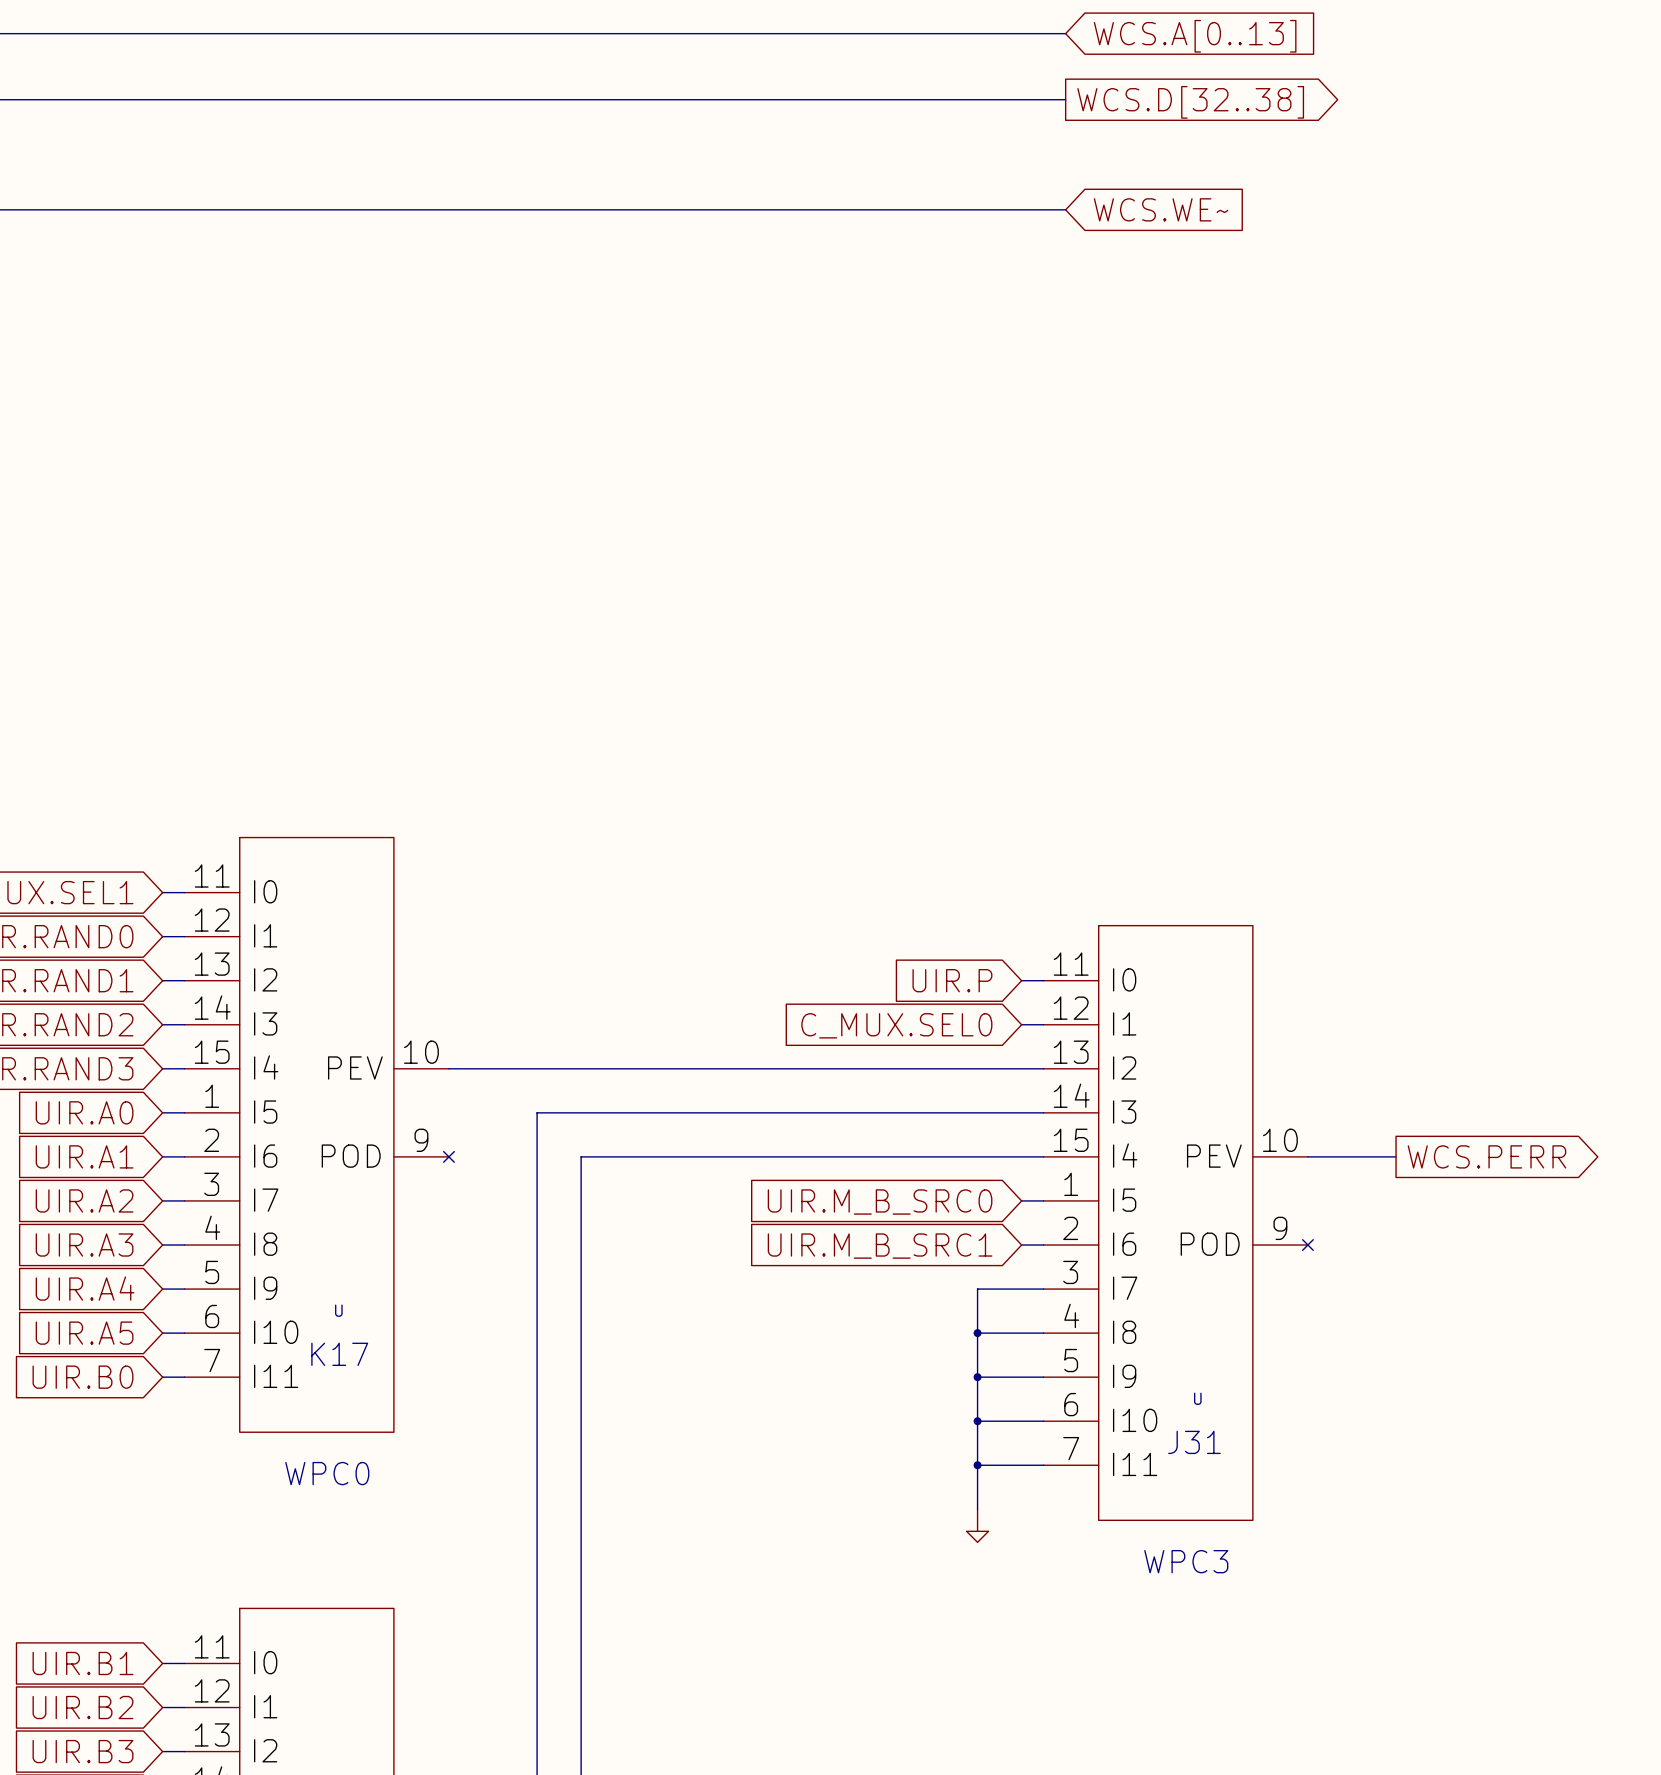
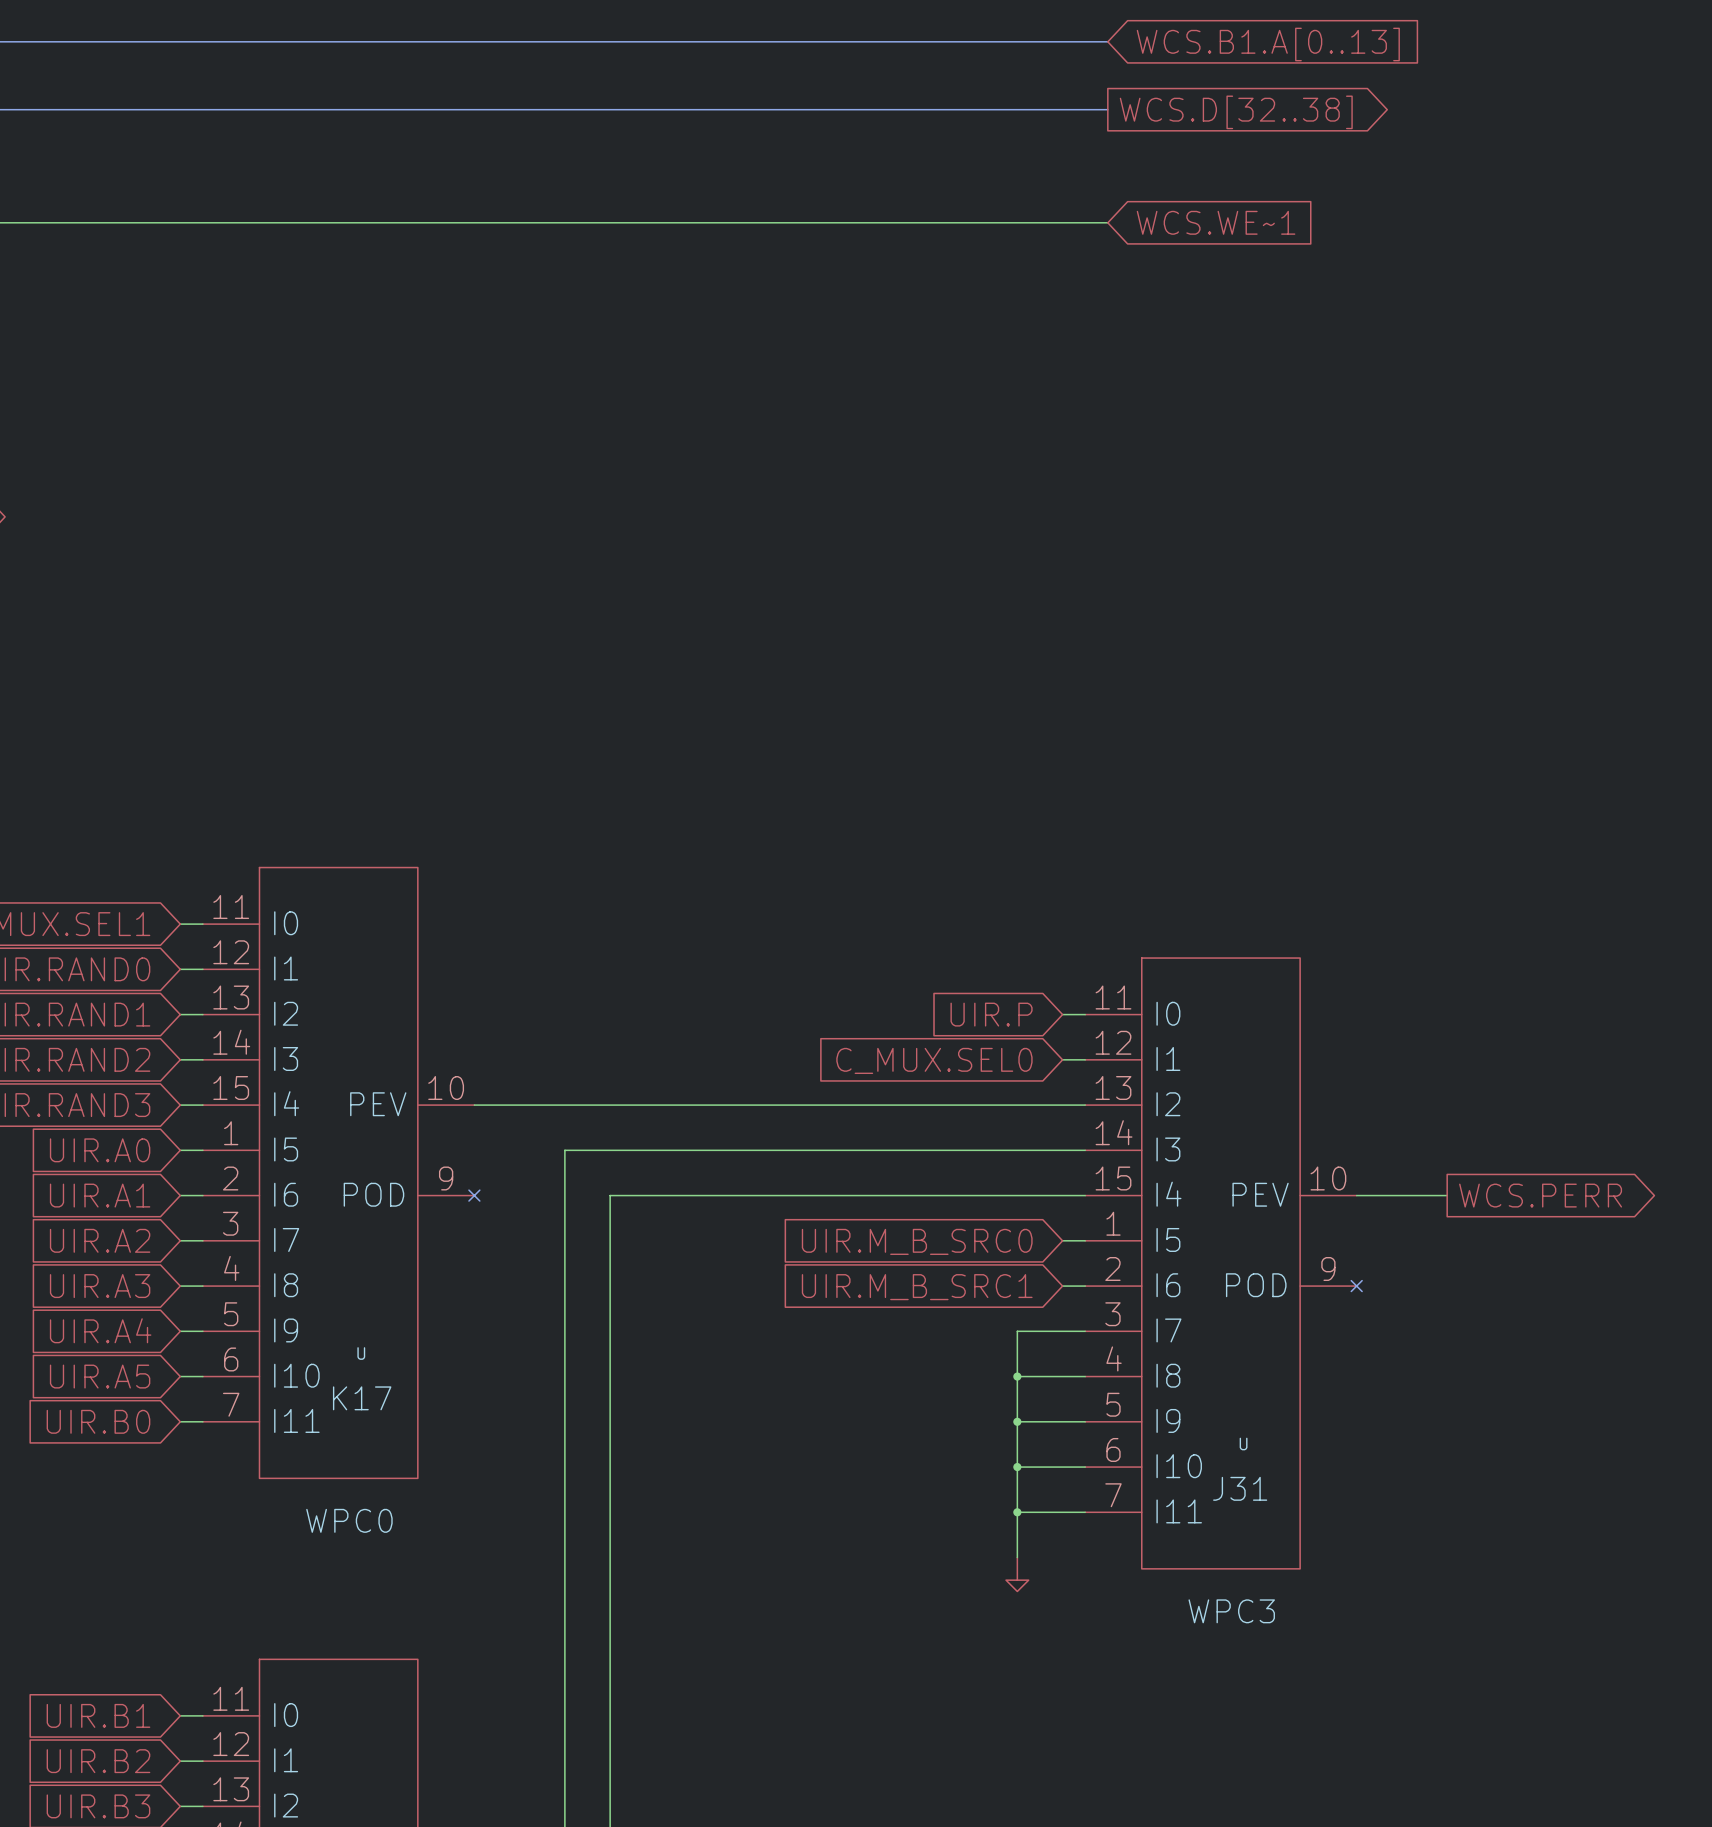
global label: WCS.A[0..13] (1195, 36) -> WCS.B1.A[0..13] (1268, 44)
global label: WCS.WE~ (1161, 209) -> WCS.WE~1 (1216, 222)

